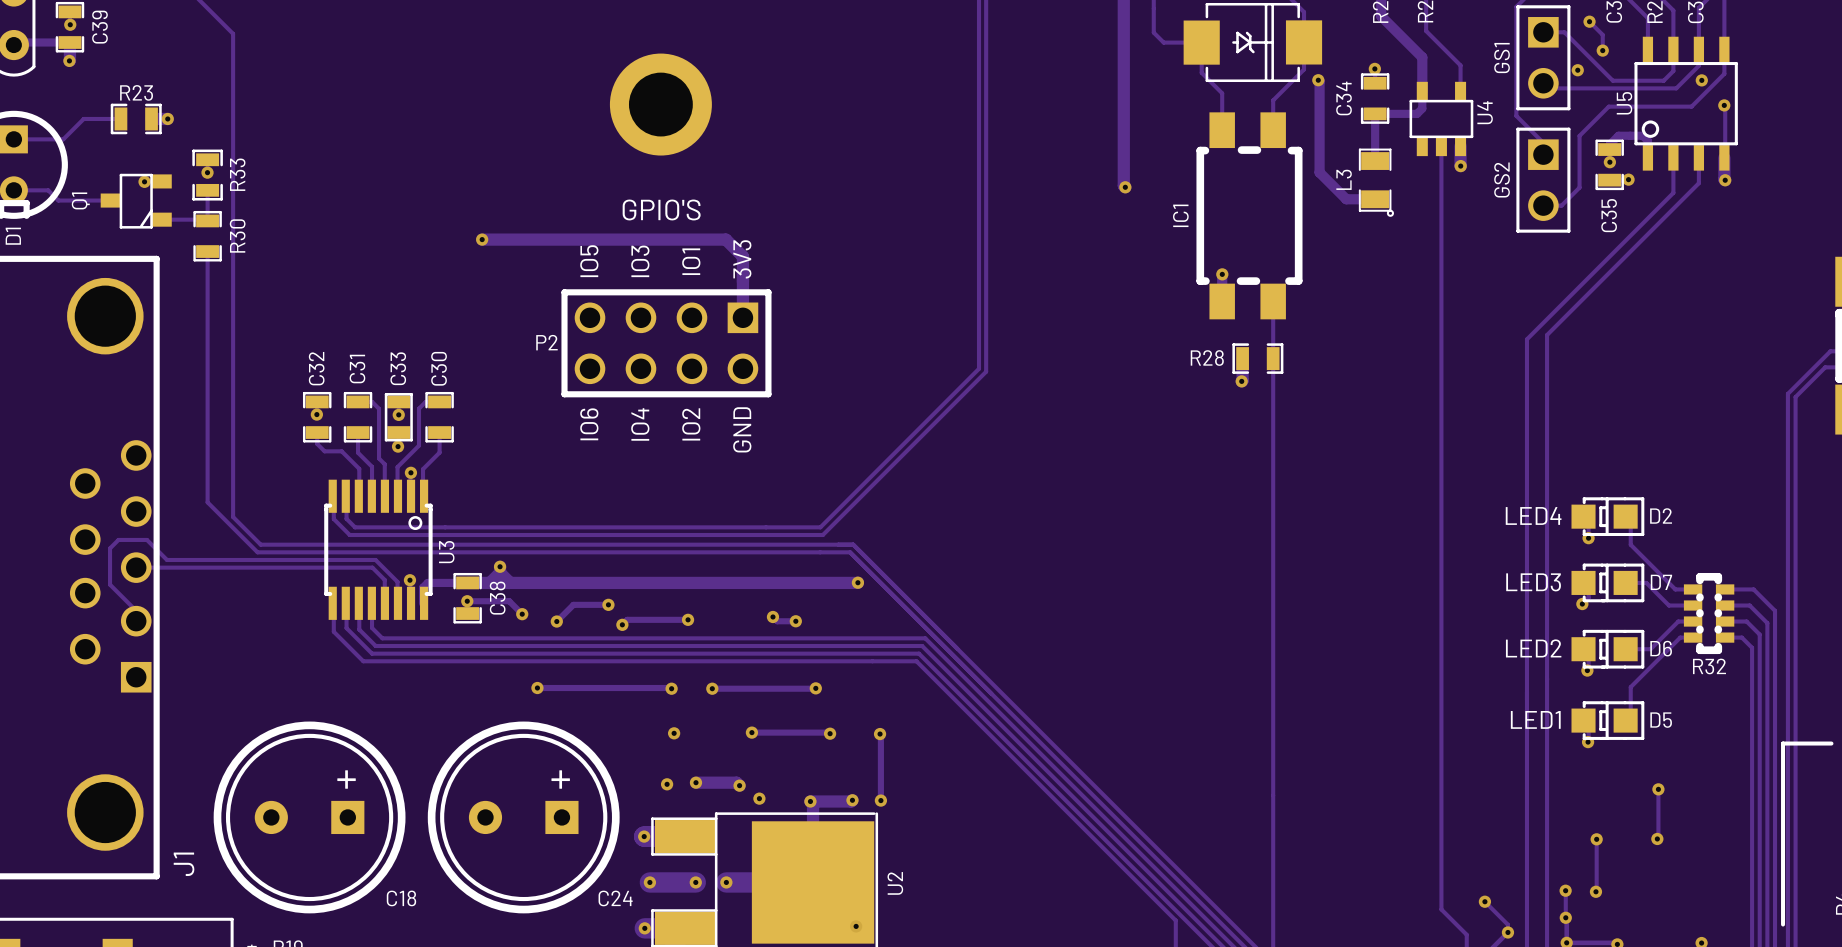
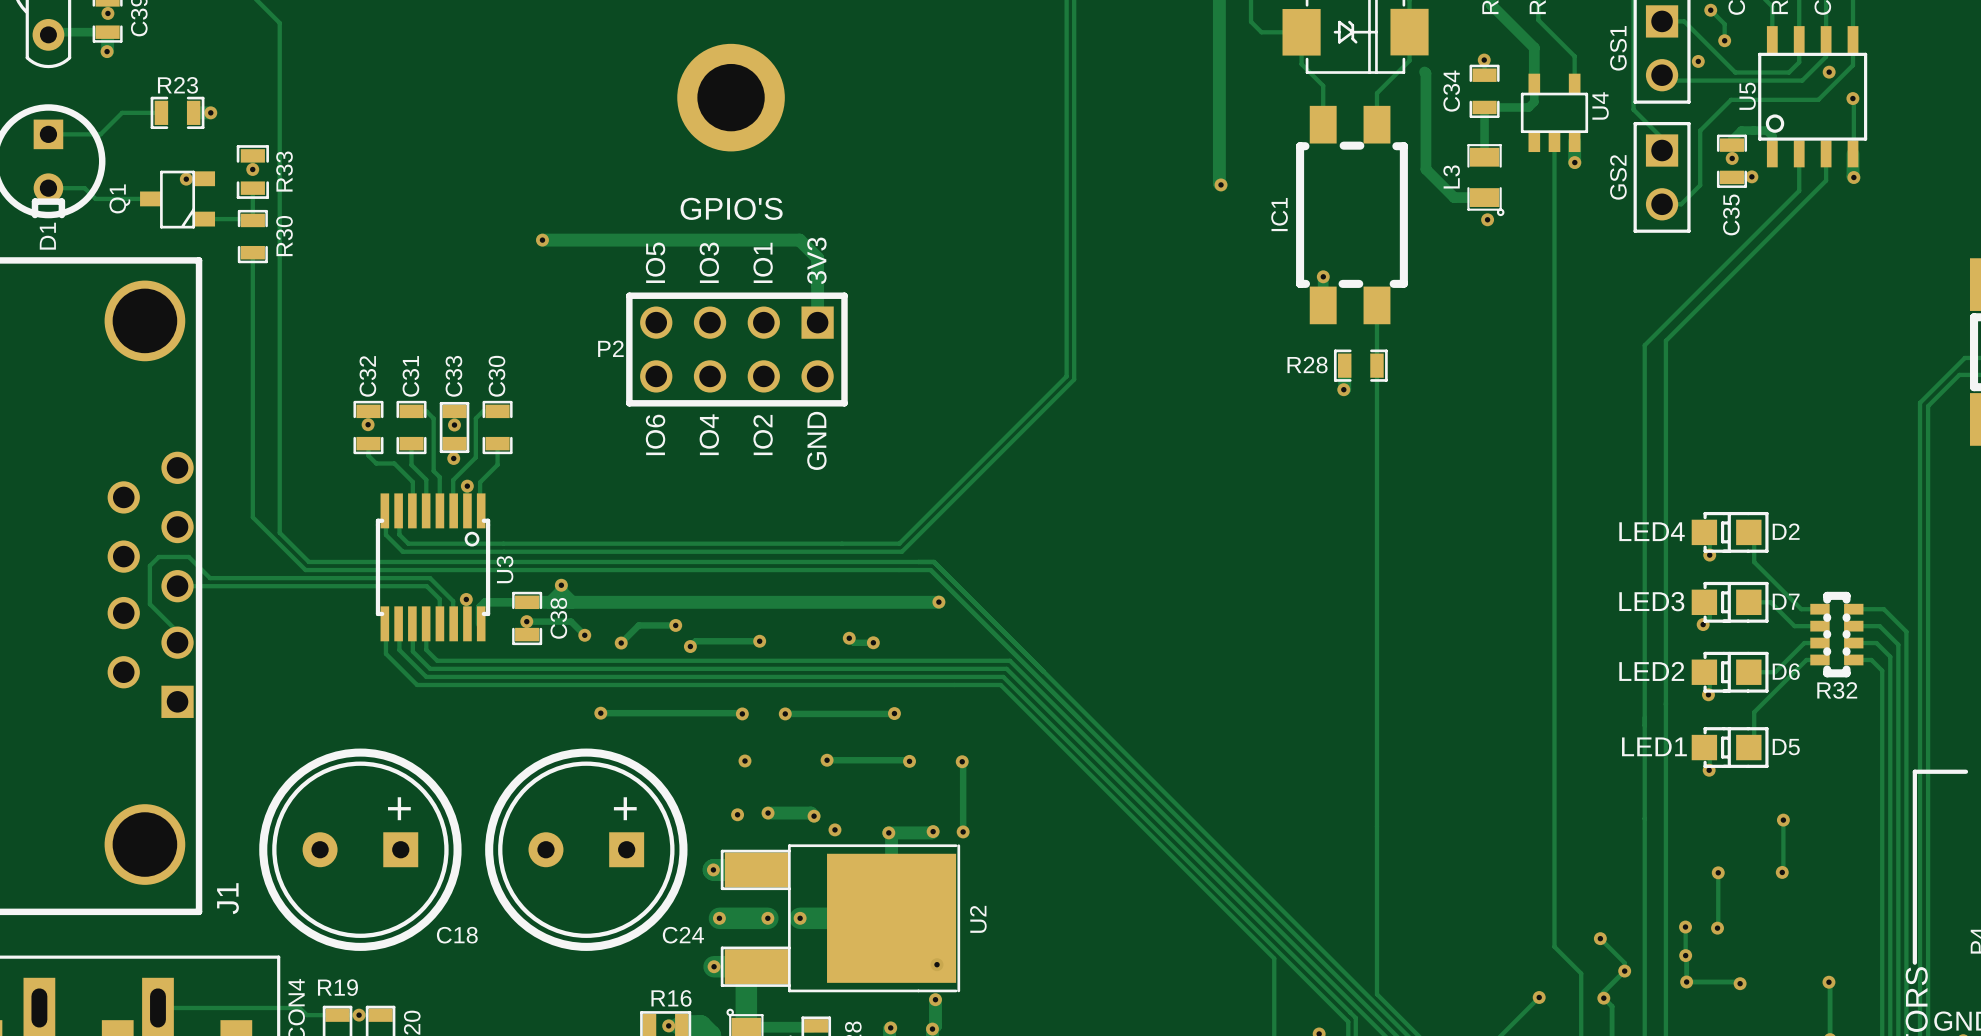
via: (1318, 80) -> none
via: none -> (1487, 219)

